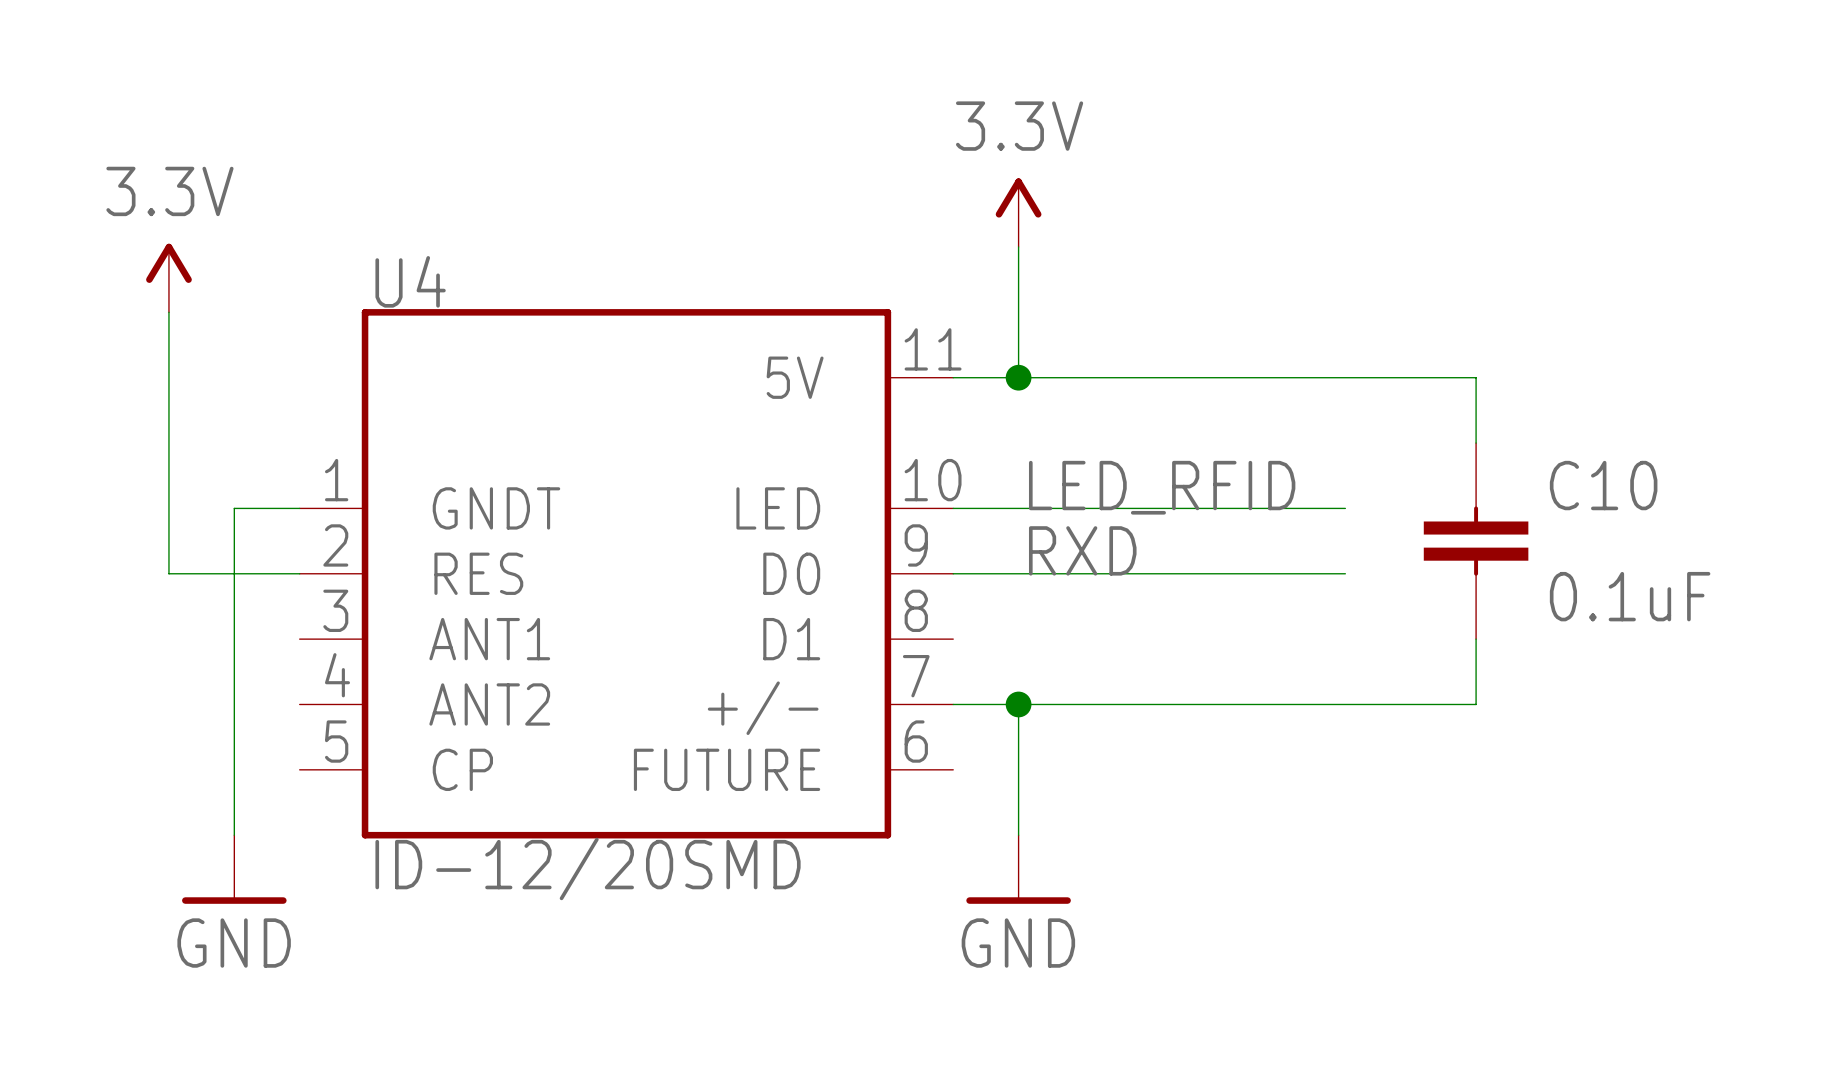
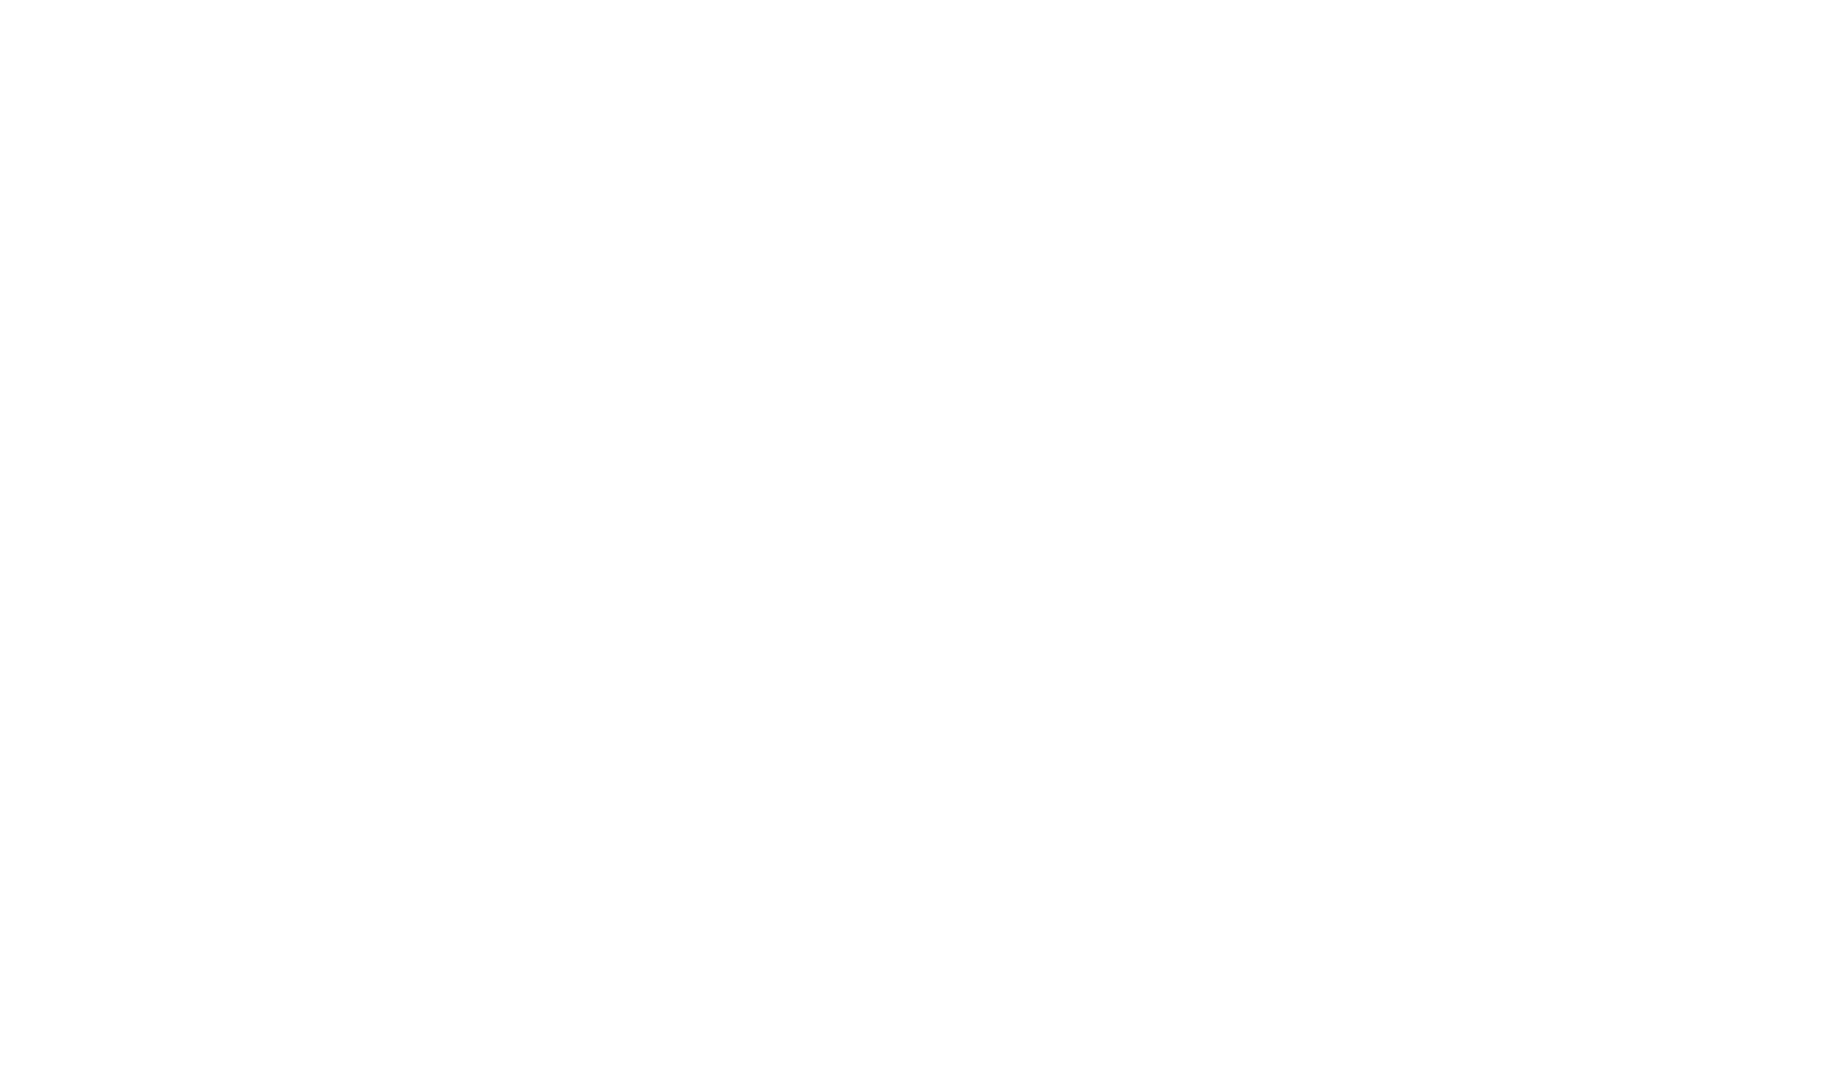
power symbol: 3.3V (1018, 212) -> none
wire: (1018, 246) (1018, 377) -> none
power symbol: 3.3V (168, 278) -> none
wire: (168, 312) (168, 573) (299, 573) -> none
wire: (953, 377) (1476, 377) (1476, 443) -> none
junction: (1018, 377) -> none
label: LED_RFID (1162, 487) -> none
wire: (299, 508) (234, 508) (234, 835) -> none
wire: (953, 508) (1345, 508) -> none
C10: 0.1uF (1476, 541) -> none
label: RXD (1082, 550) -> none
U4: ID-12/20SMD (626, 573) -> none
wire: (953, 573) (1345, 573) -> none
wire: (1476, 639) (1476, 704) (953, 704) -> none
wire: (1018, 704) (1018, 835) -> none
junction: (1018, 704) -> none
power symbol: GND (234, 869) -> none
power symbol: GND (1018, 869) -> none

